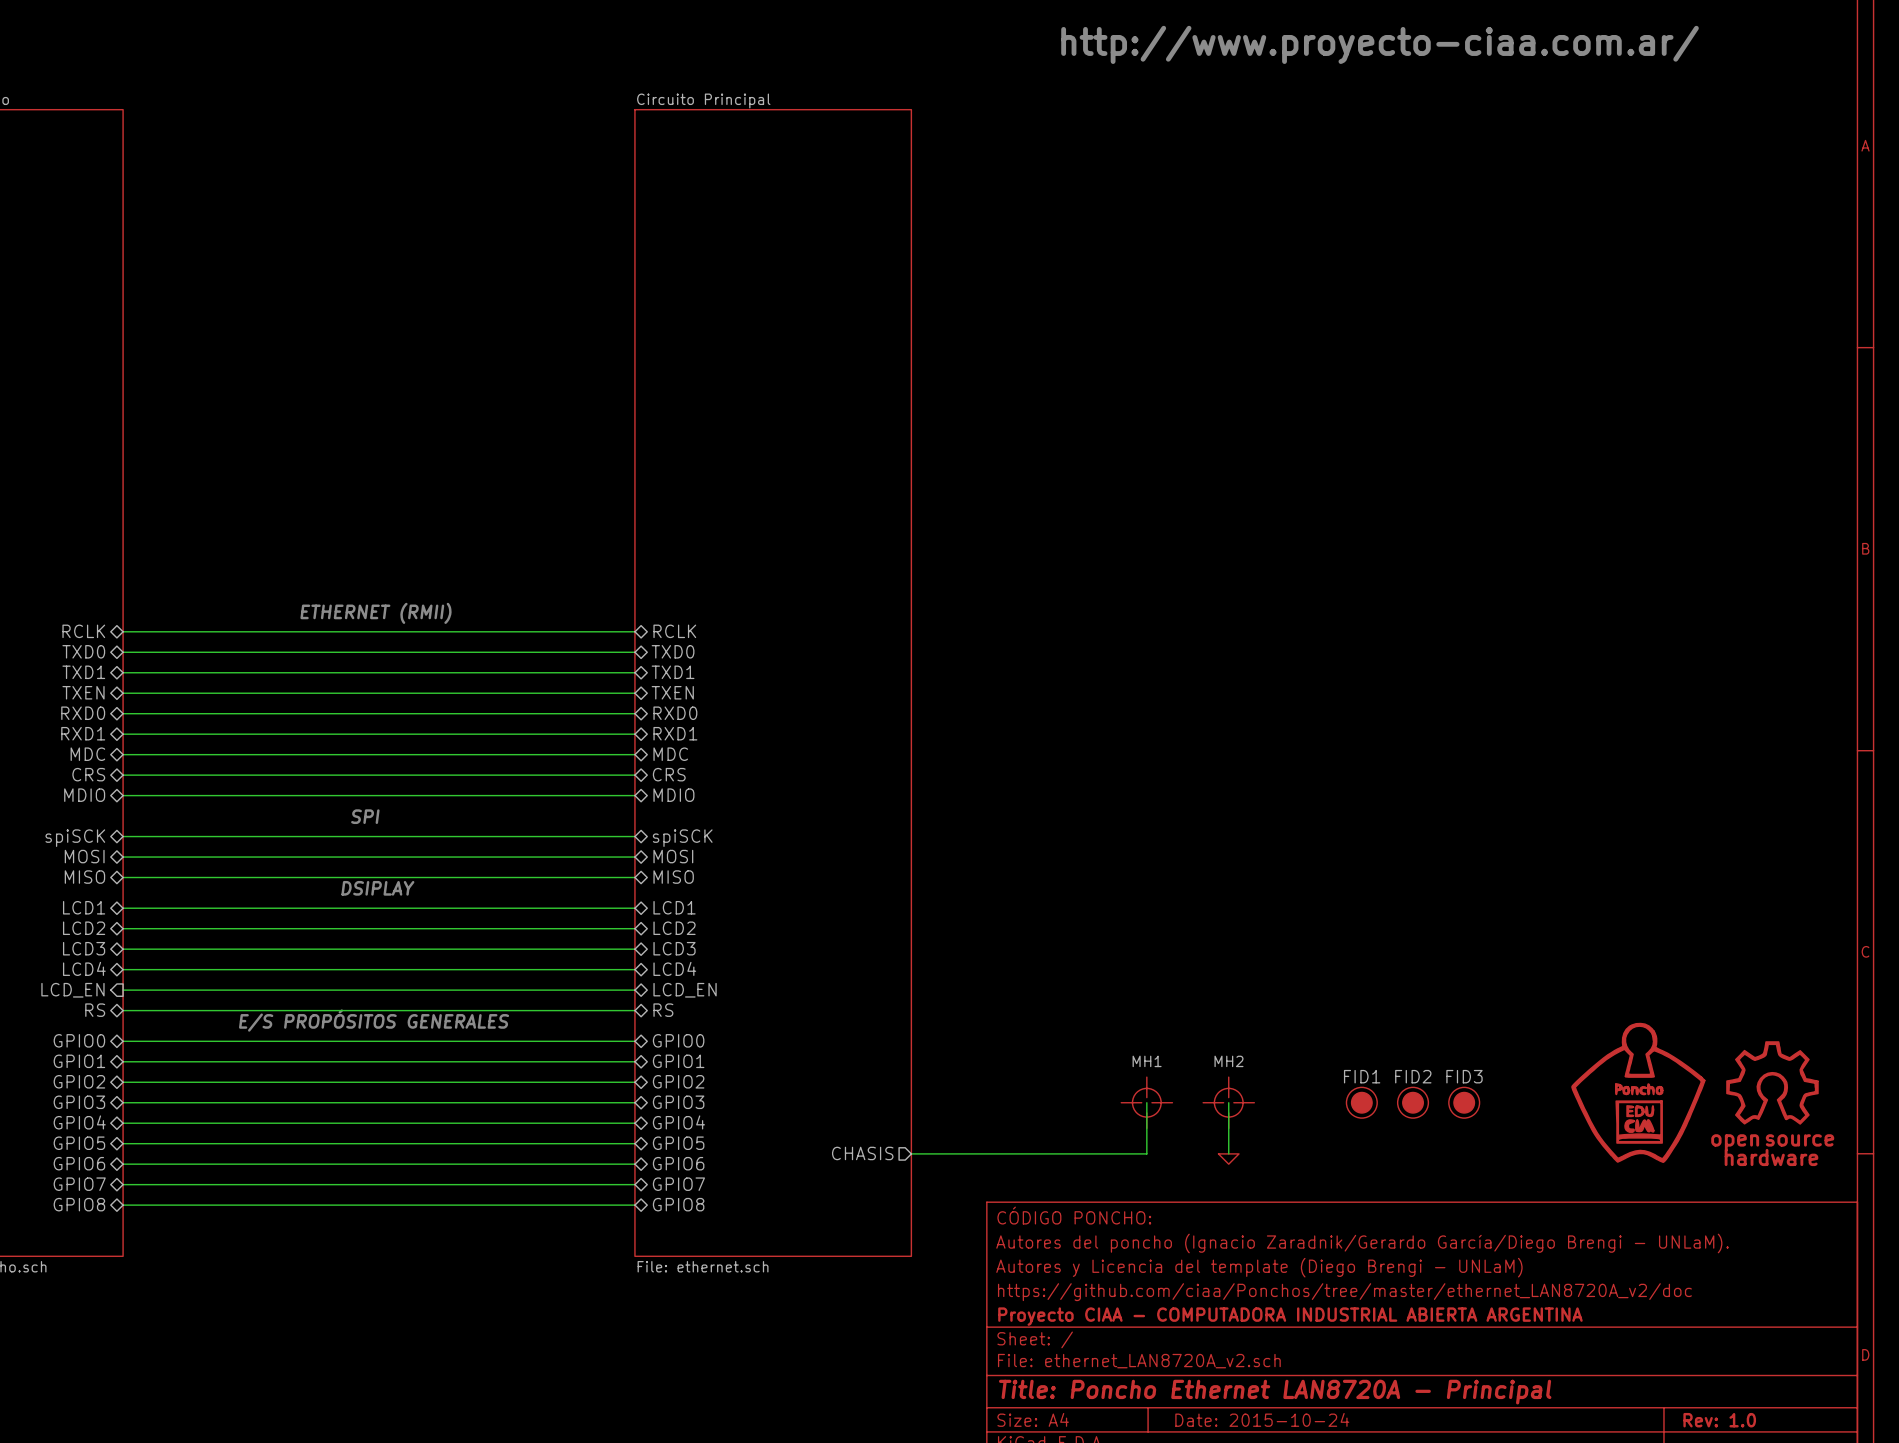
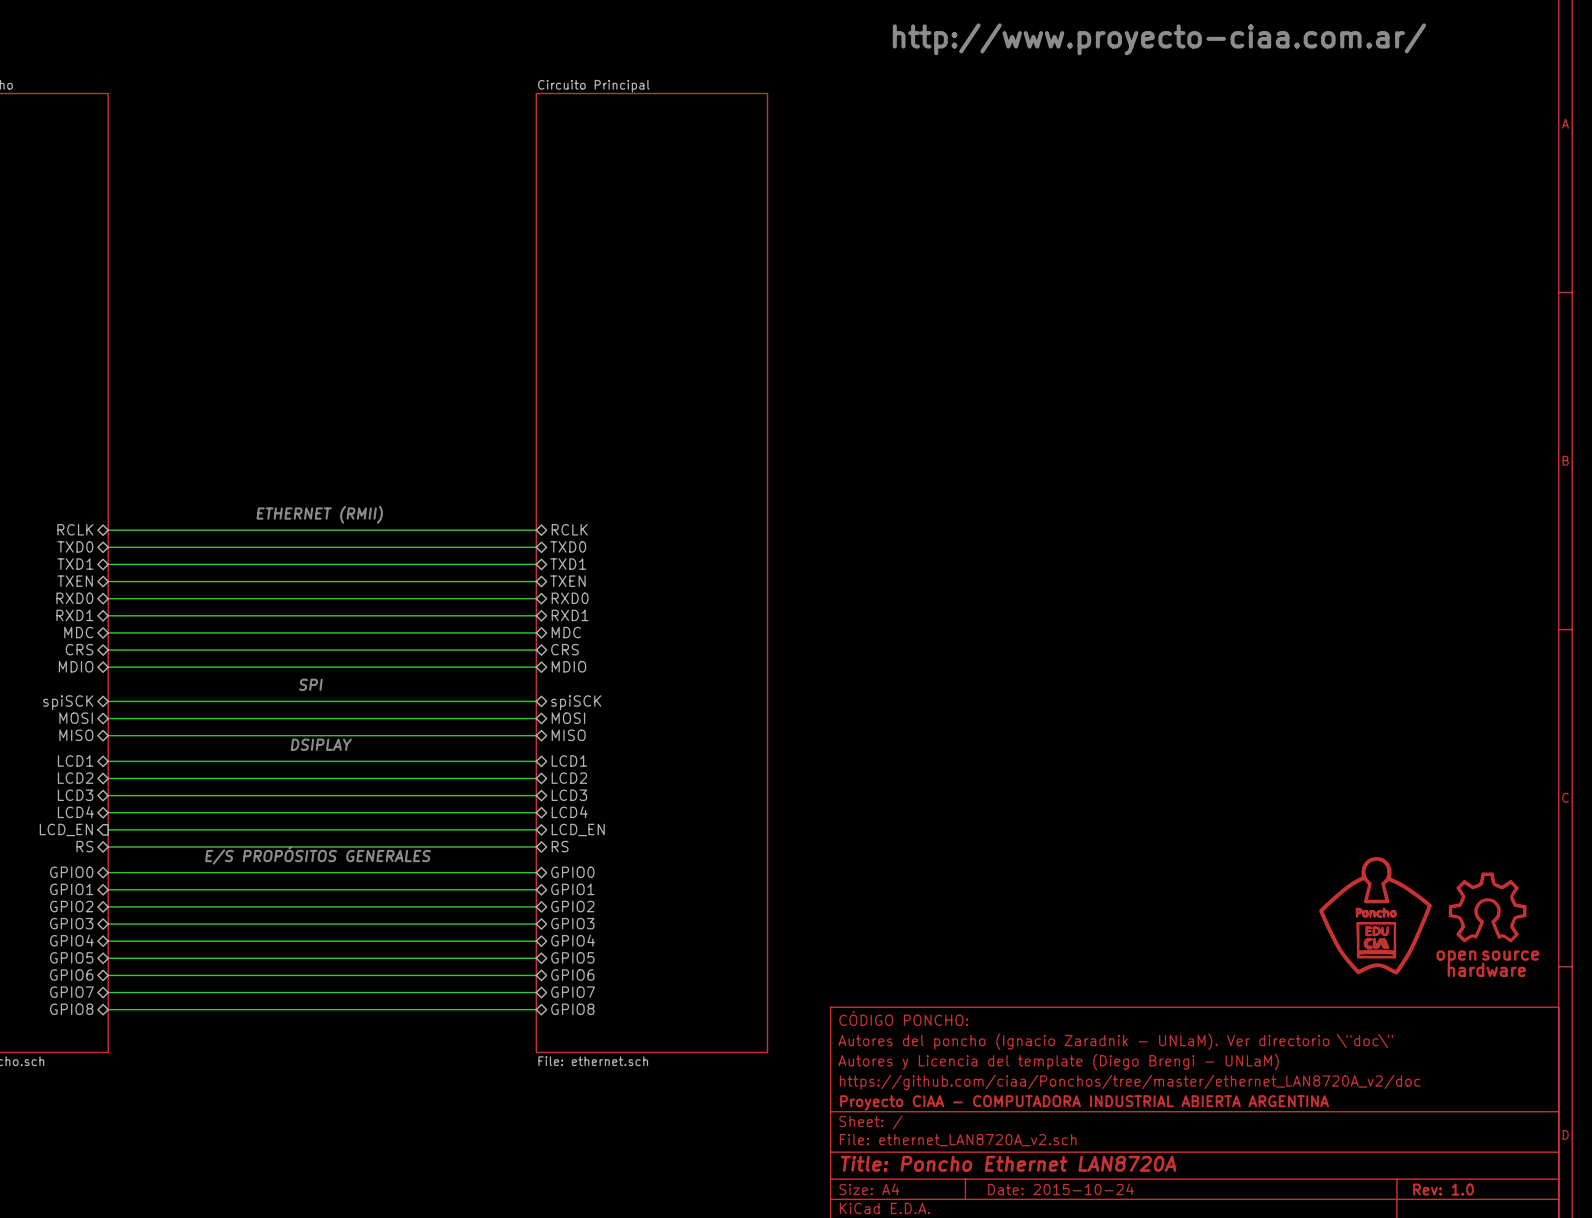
wire: (1146, 1102) (1146, 1153) (911, 1153) -> none
MH1: (1146, 1102) -> none
wire: (1228, 1102) (1228, 1153) -> none
MH2: (1228, 1102) -> none
FID1: (1361, 1102) -> none
FID2: (1413, 1102) -> none
FID3: (1464, 1102) -> none
sheet pin: CHASIS (862, 1153) -> none
power symbol: (1228, 1159) -> none
title block: Autores del poncho (Ignacio Zaradnik/Gerardo García/Diego Brengi - UNLaM). (1362, 1243) -> Autores del poncho (Ignacio Zaradnik - UNLaM). Ver directorio \"doc\" (1115, 1041)
title block: Title: Poncho Ethernet LAN8720A - Principal (1275, 1392) -> Title: Poncho Ethernet LAN8720A (1008, 1163)

